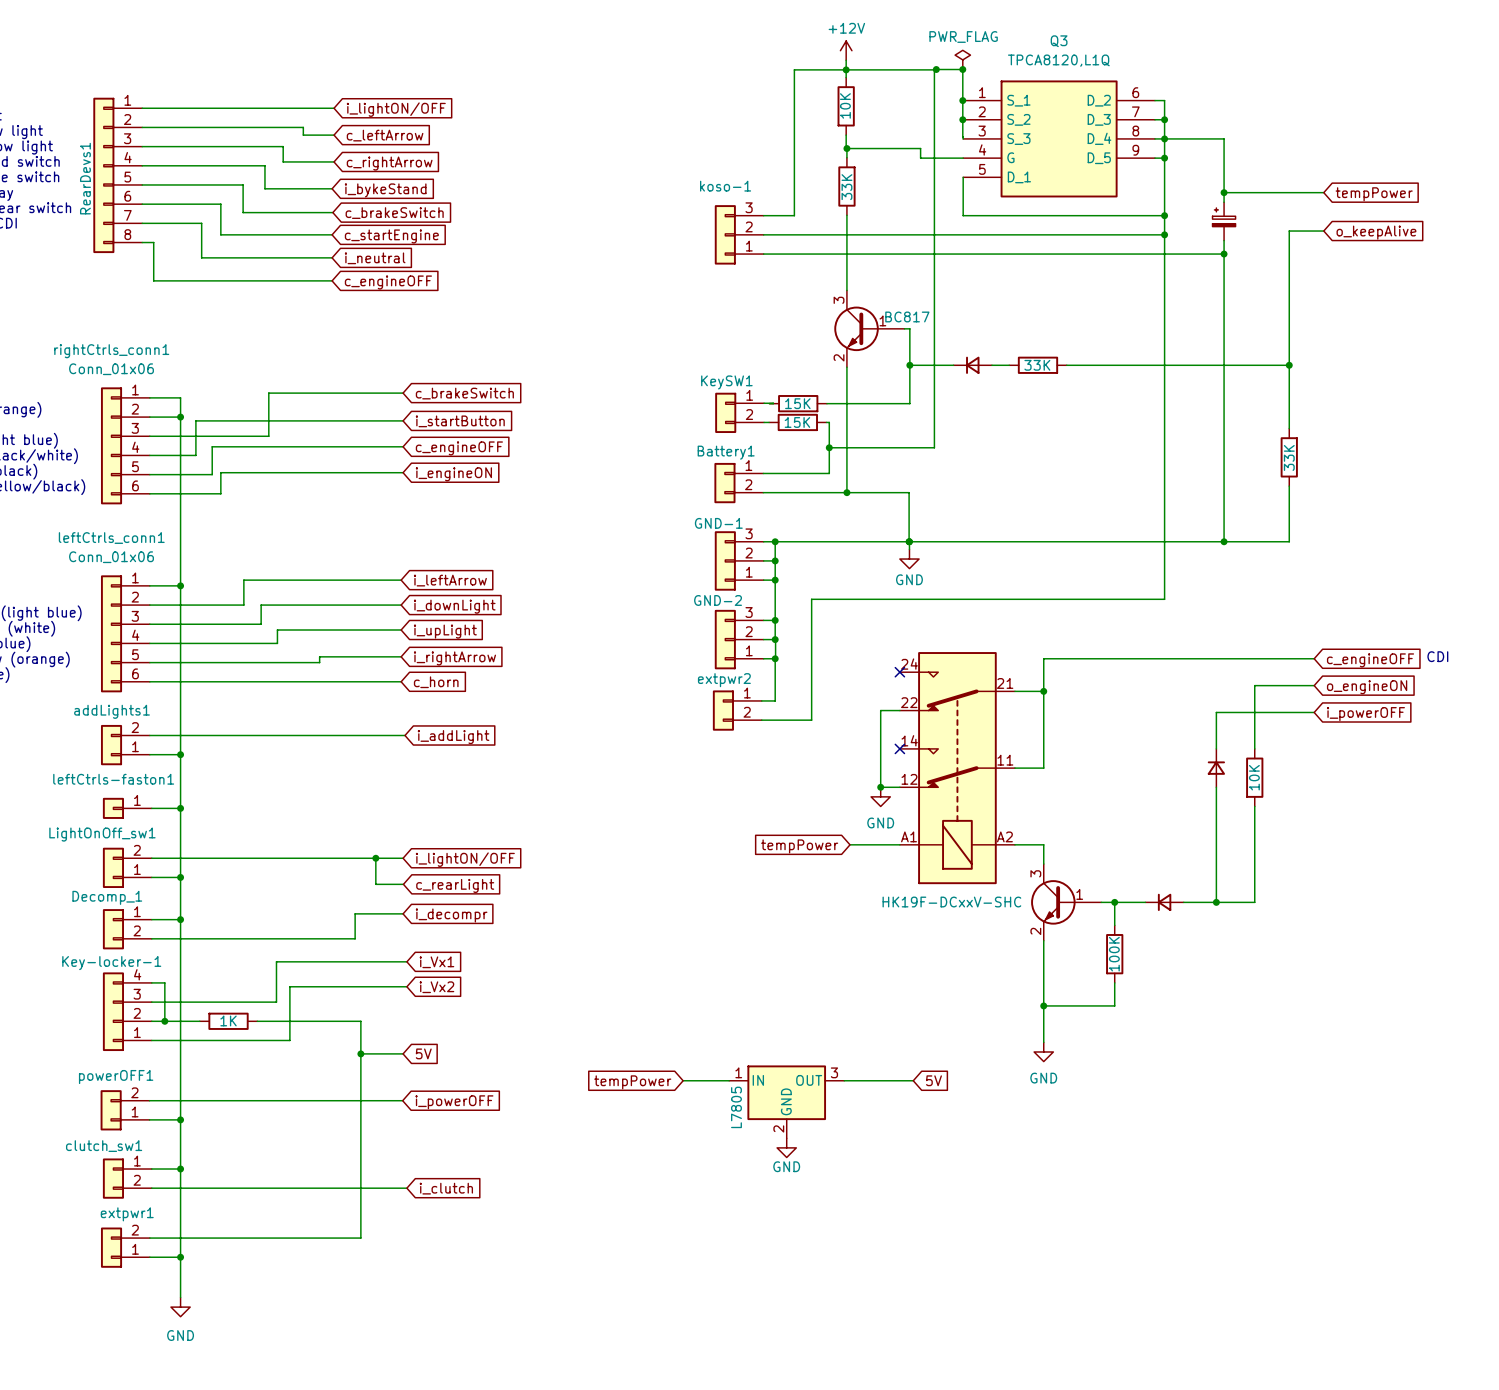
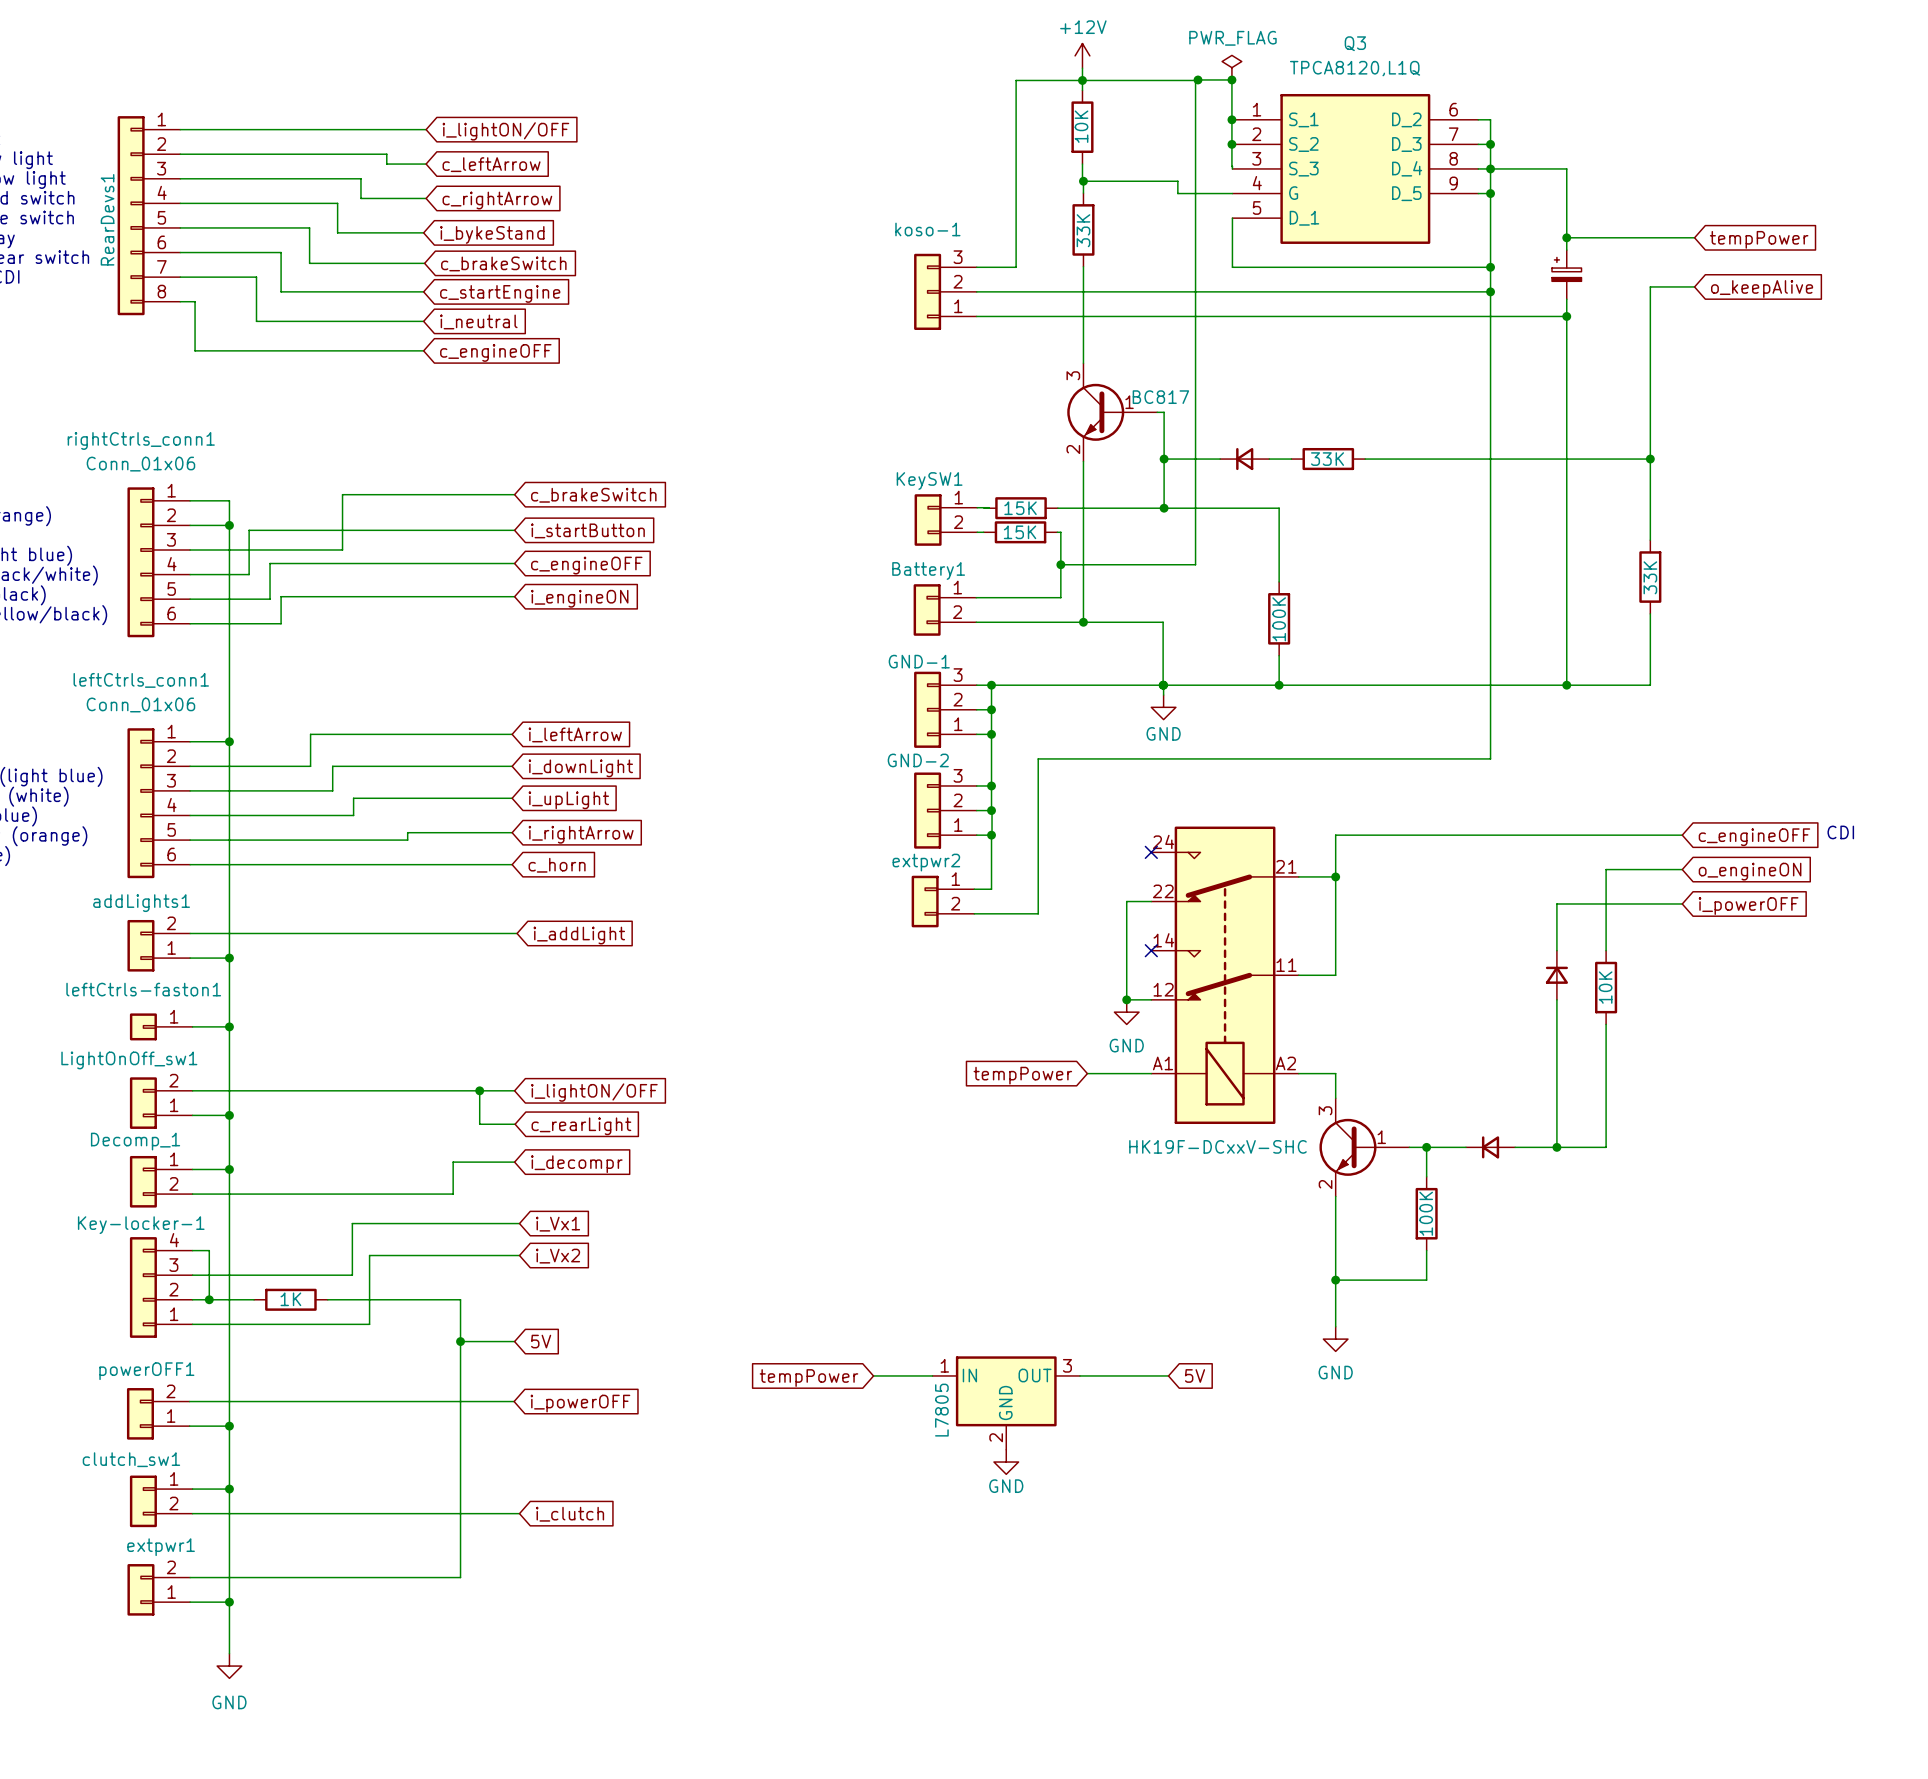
wire: none -> (1164, 508) (1279, 508) (1279, 581)
junction: none -> (1164, 508)
part: none -> 100K (1279, 618)
wire: none -> (1279, 655) (1279, 685)
junction: none -> (1279, 685)

